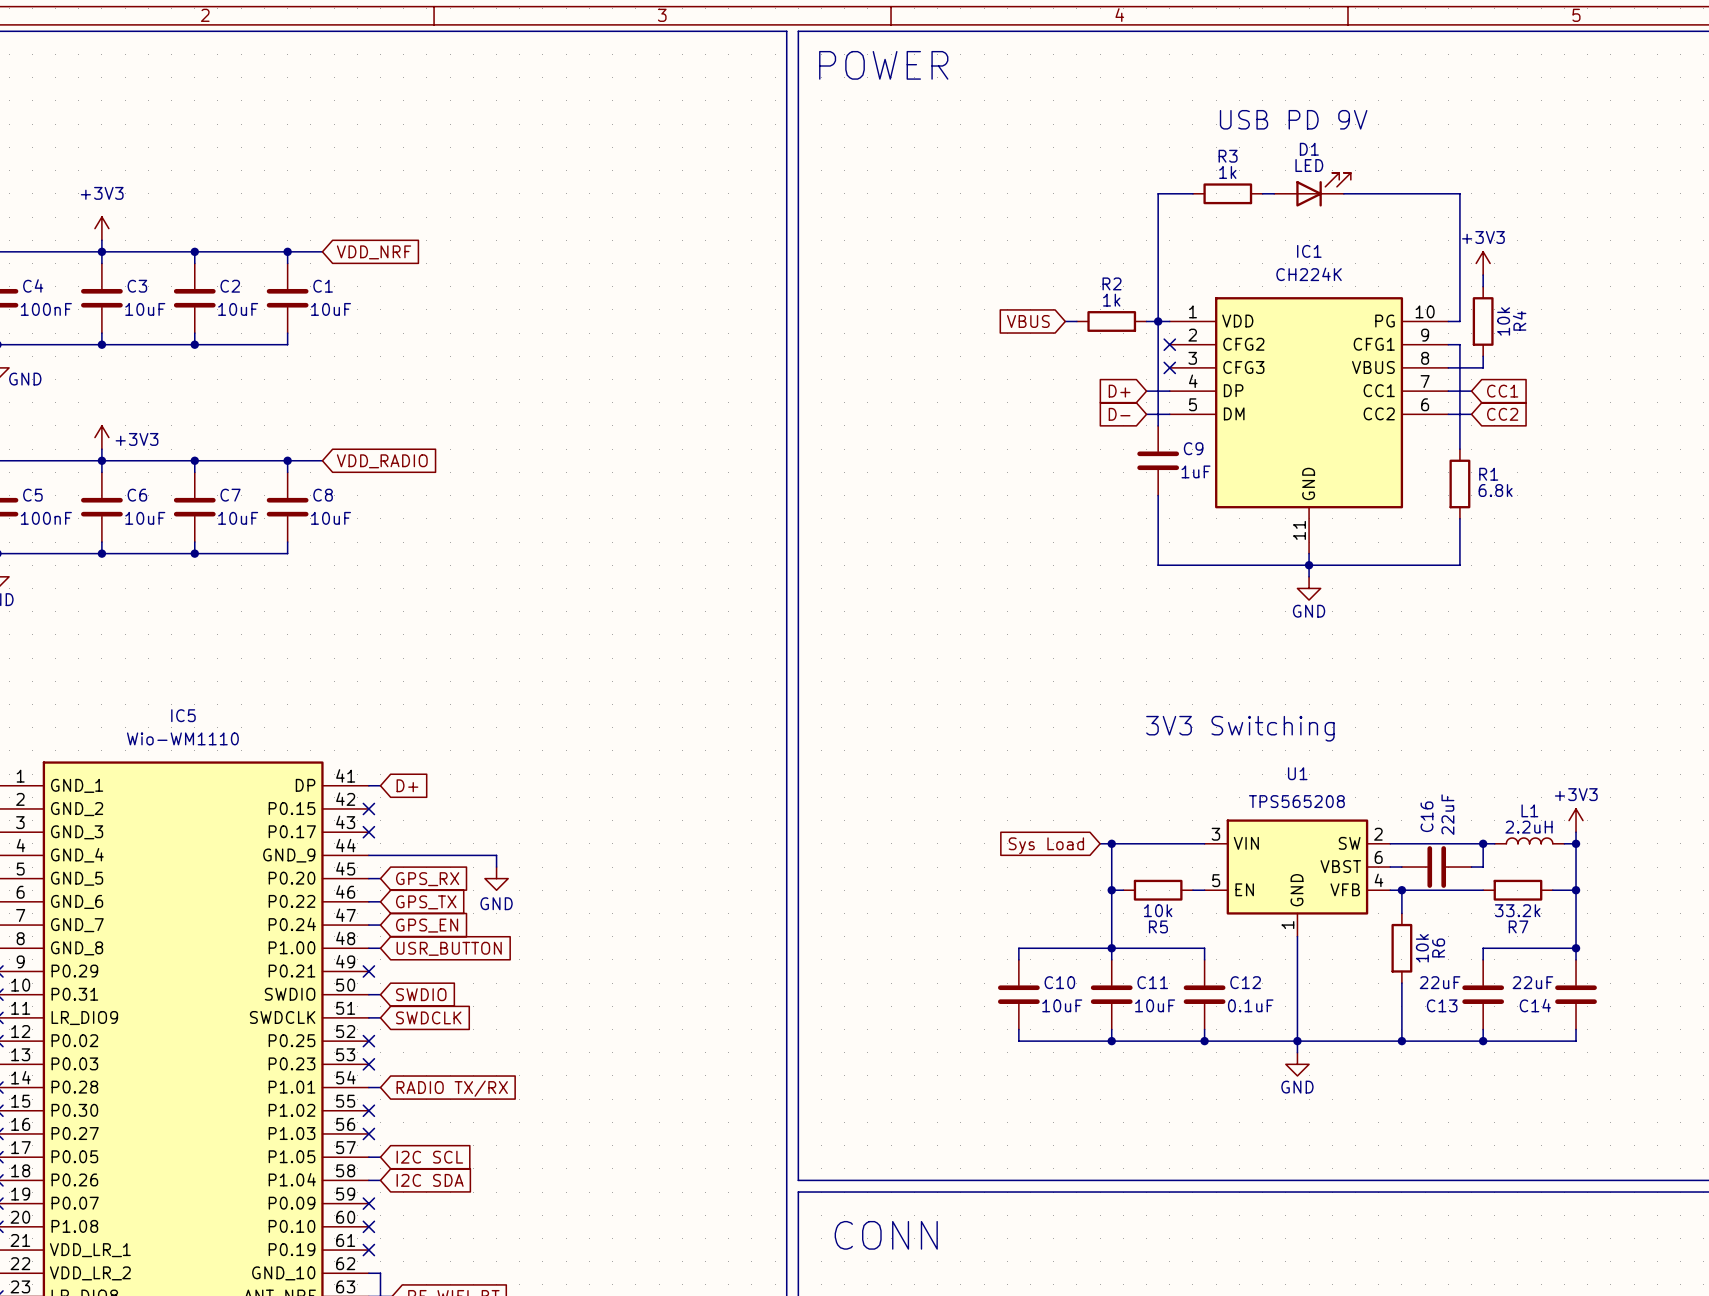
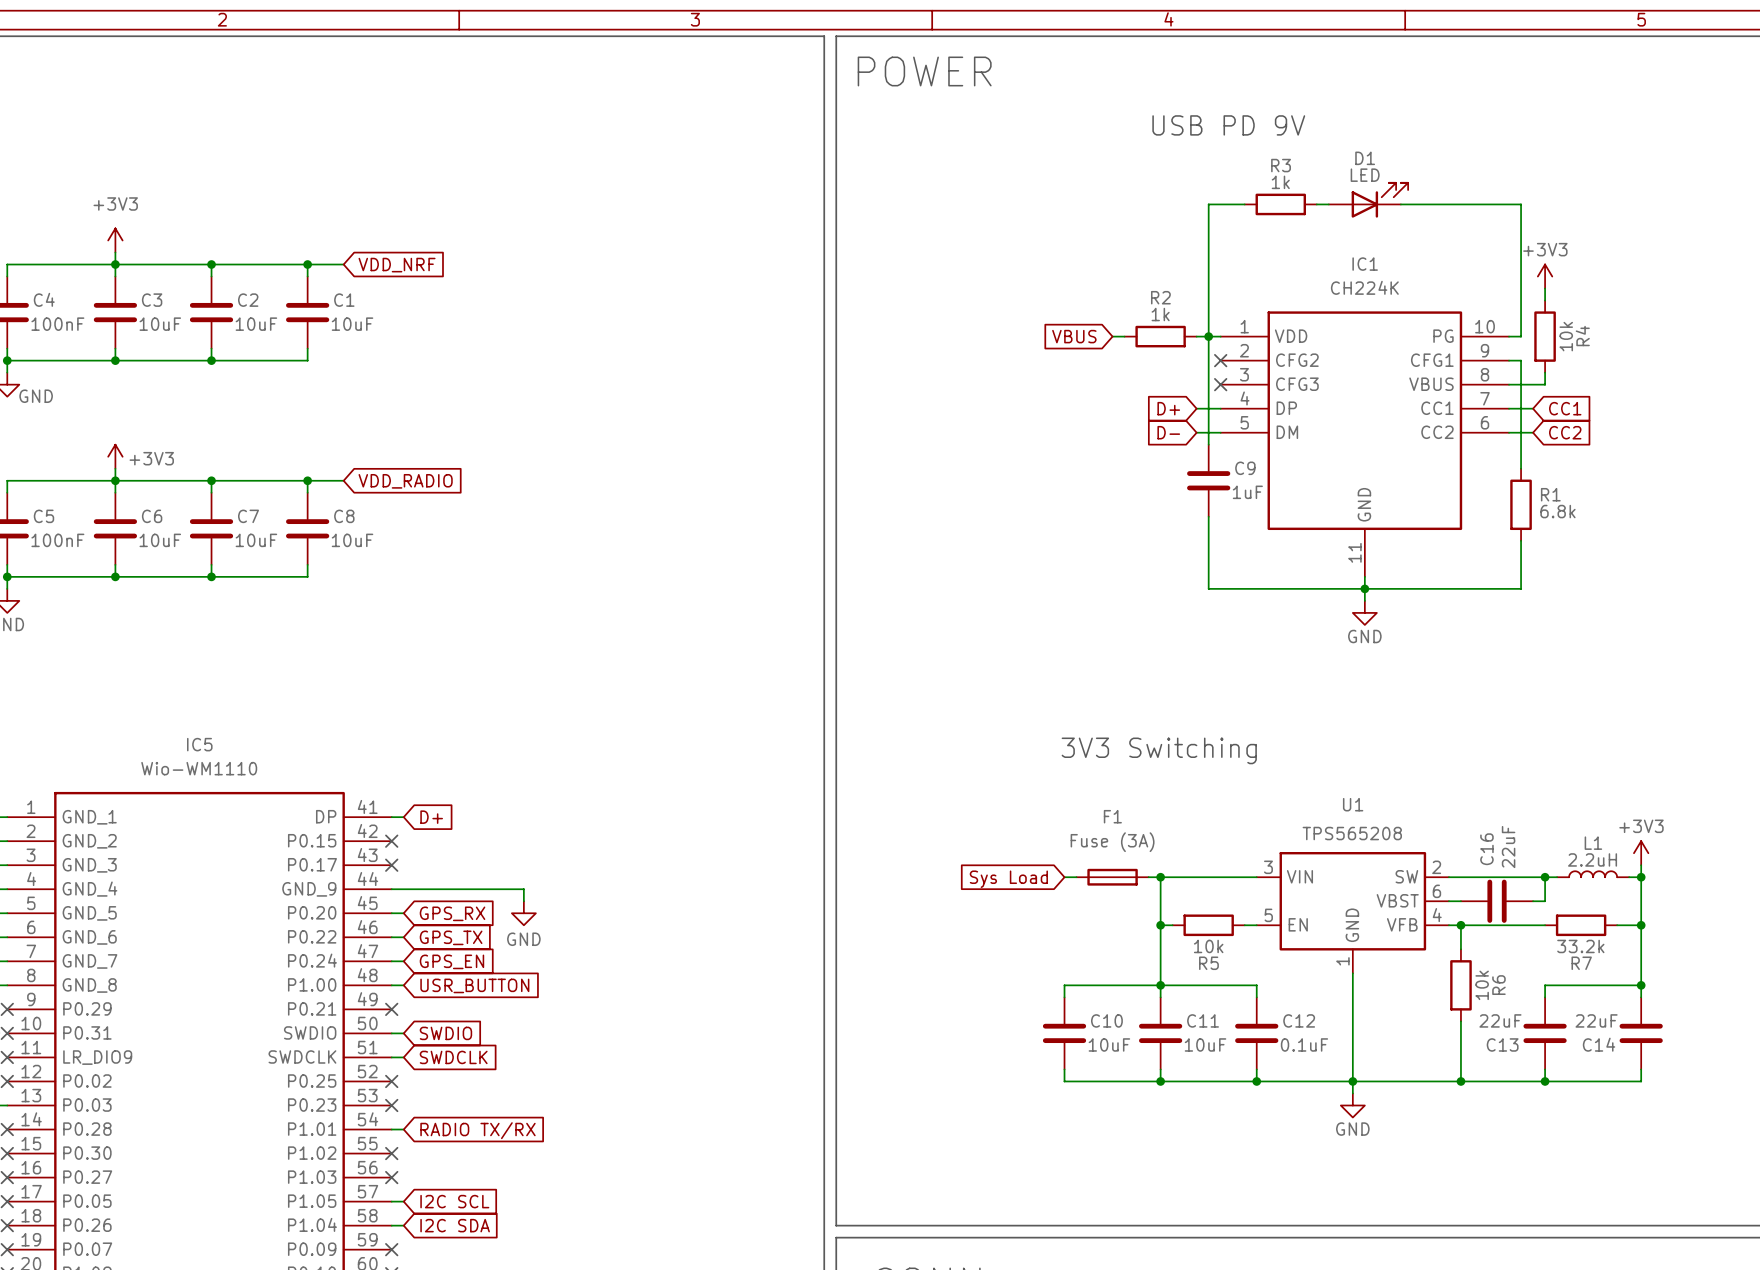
text position: USB PD 9V (1293, 119) -> USB PD 9V (1228, 125)
text position: 3V3 Switching (1240, 728) -> 3V3 Switching (1159, 750)
wire: none -> (1064, 877) (1076, 877)
F1: none -> Fuse (3A) (1112, 877)
global label position: Sys Load (1046, 845) -> Sys Load (1008, 879)

